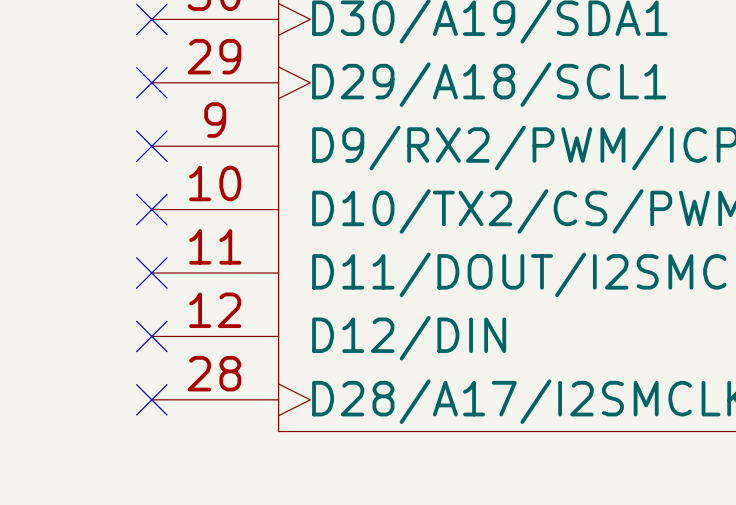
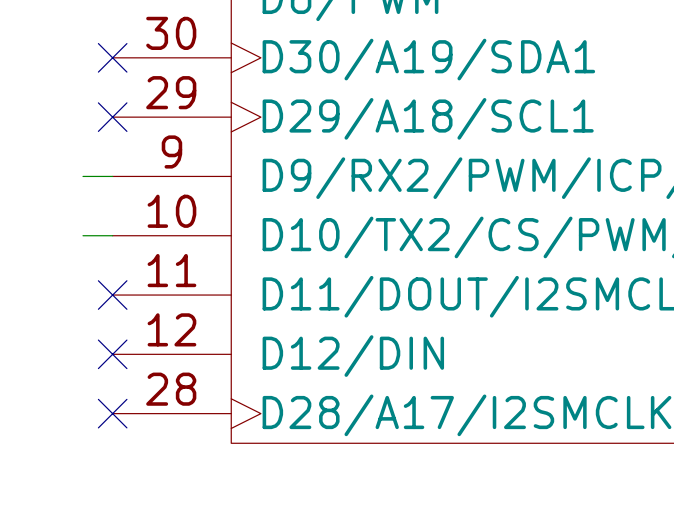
wire: none -> (83, 176) (112, 176)
no-connect mark: (151, 146) -> none
wire: none -> (83, 235) (112, 235)
no-connect mark: (151, 209) -> none

